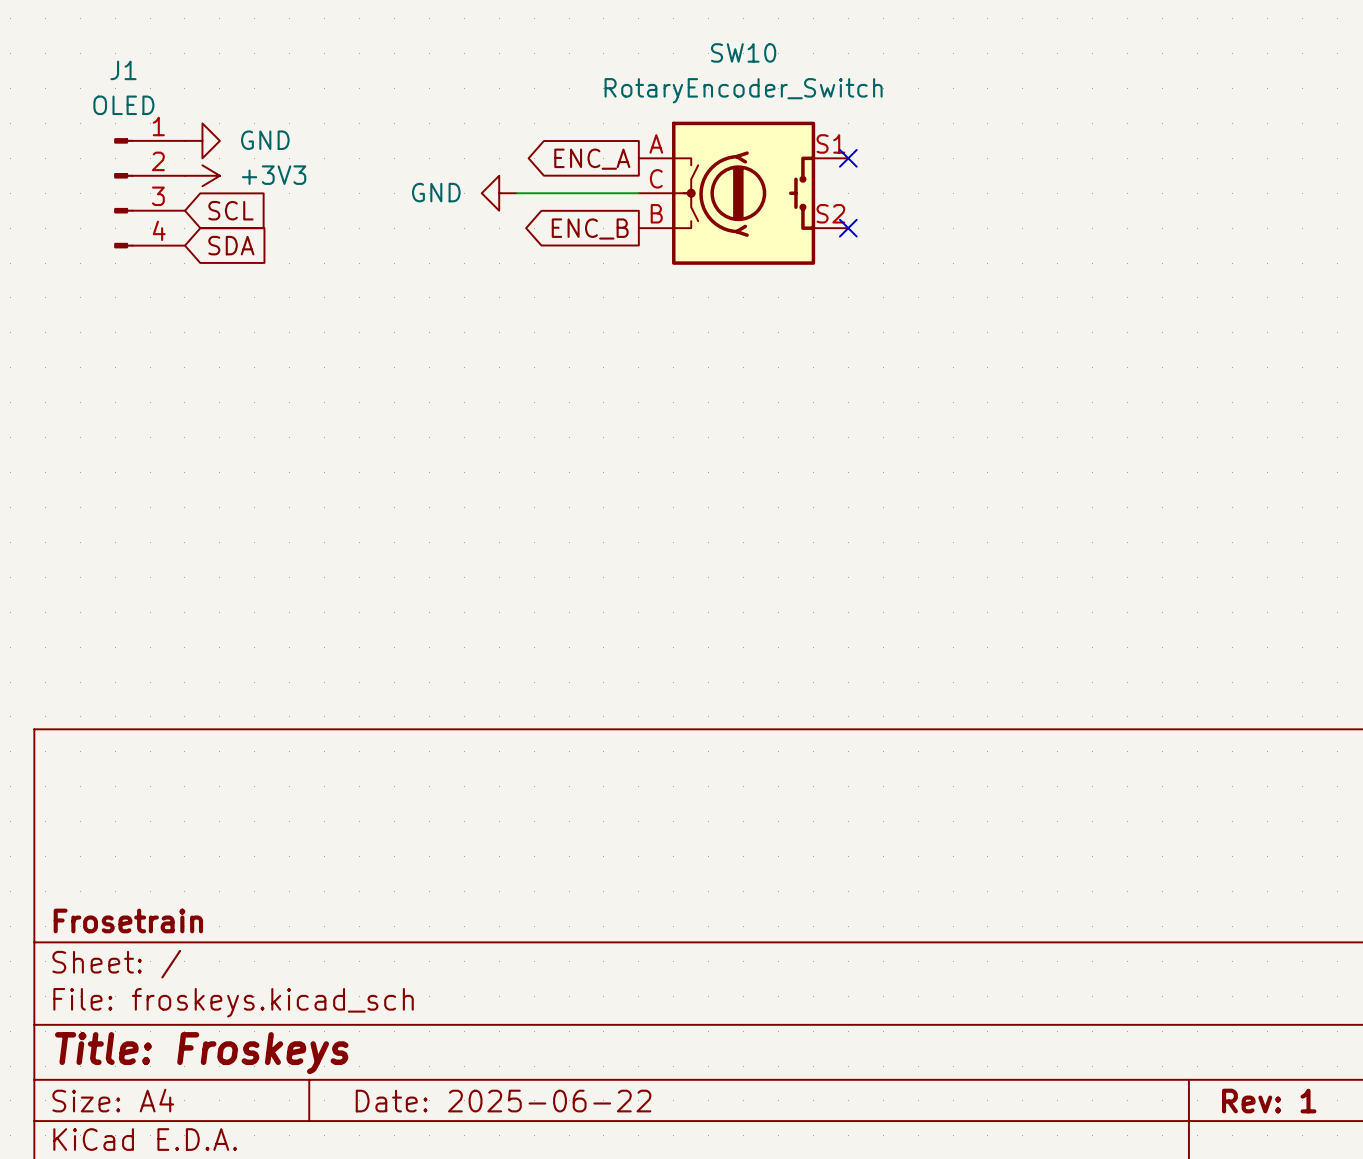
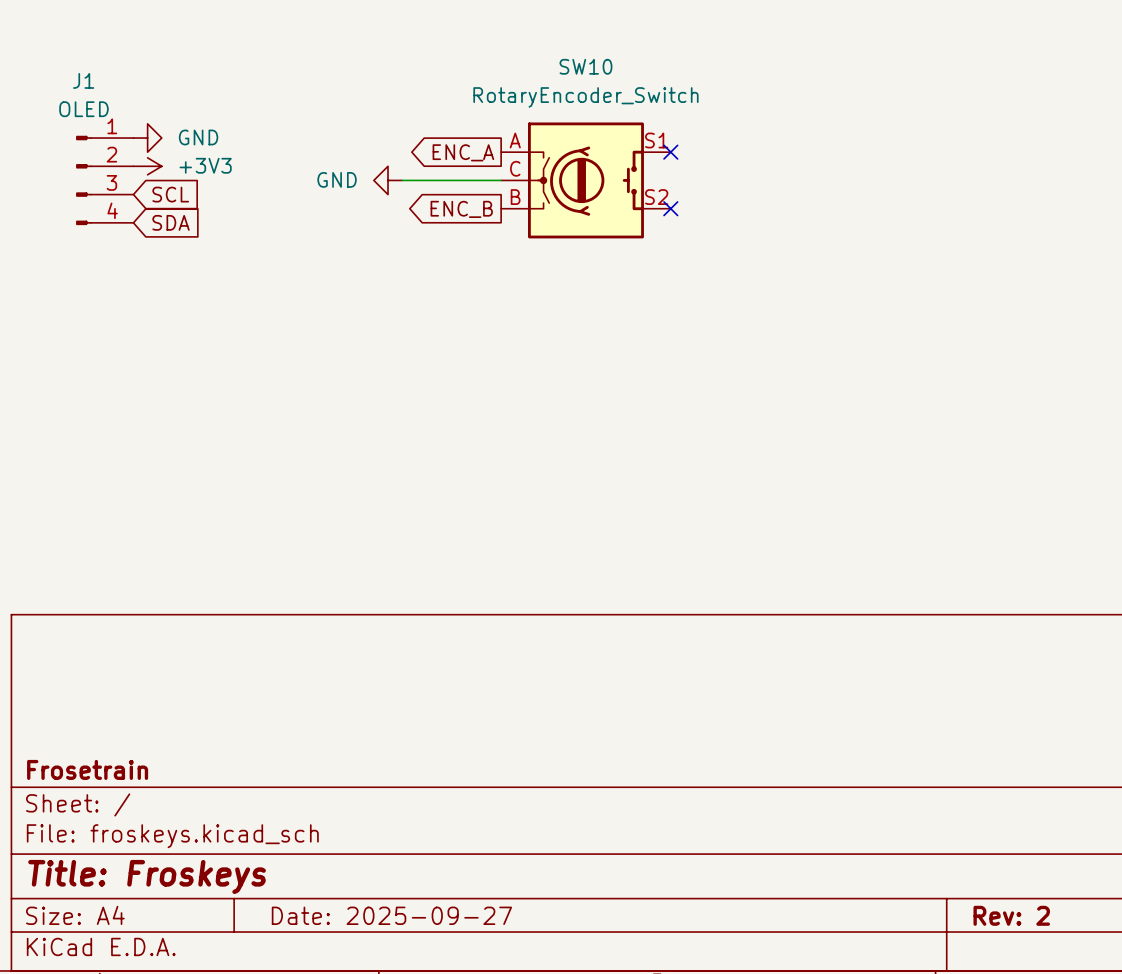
title block: Date: 2025-06-22 (503, 1101) -> Date: 2025-09-27 (391, 915)
title block: Rev: 1 (1269, 1101) -> Rev: 2 (1011, 915)

